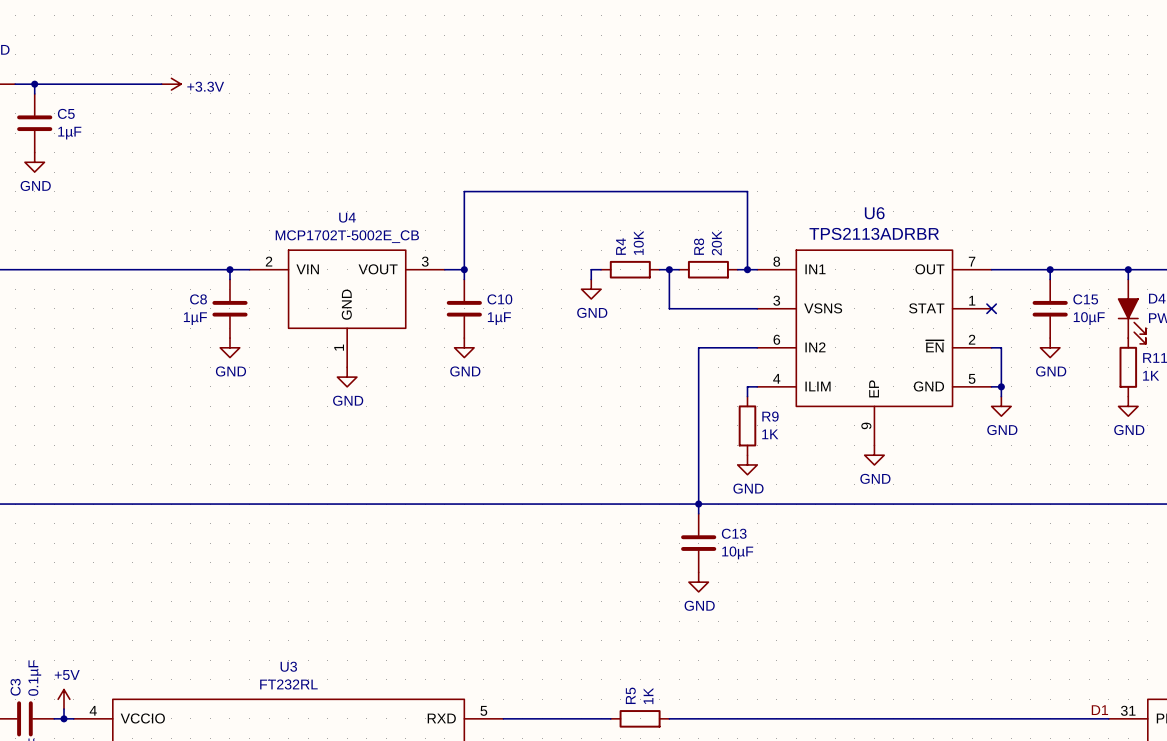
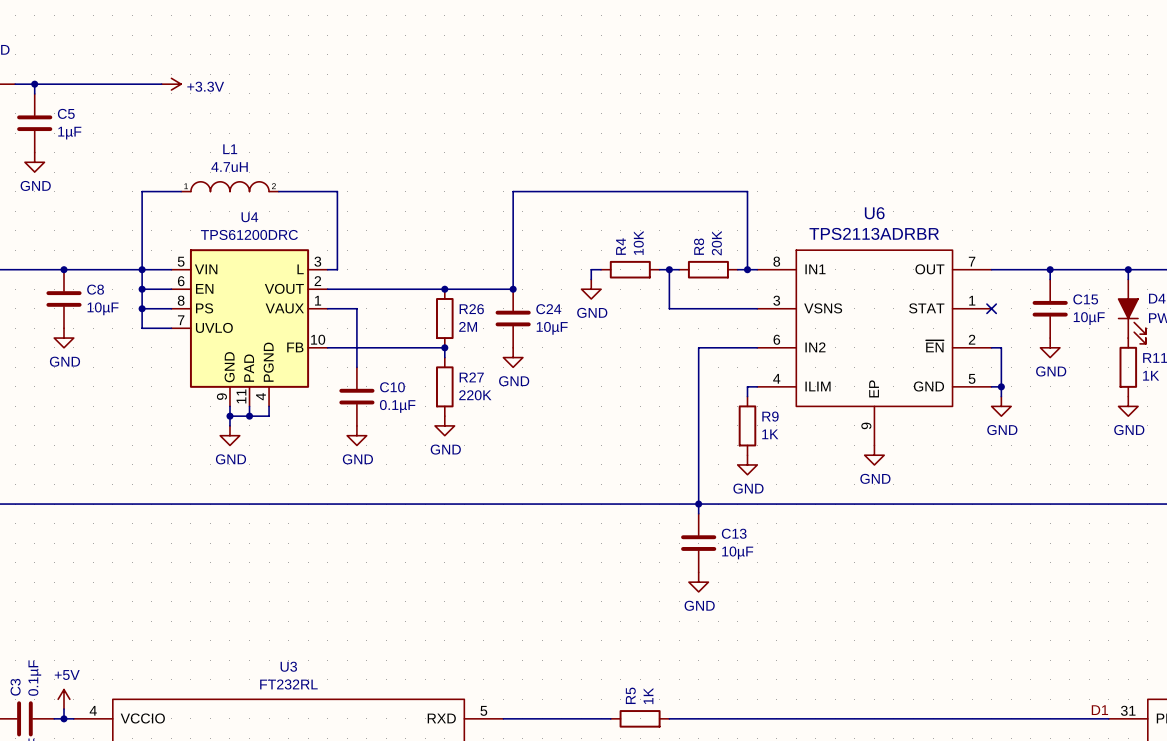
L1: none -> 4.7uH (229, 186)
wire: none -> (181, 191) (142, 191) (142, 328) (171, 328)
wire: none -> (278, 191) (337, 191) (337, 269) (327, 269)
wire: (513, 191) (464, 191) (464, 279) -> (513, 191) (513, 289) (327, 289)
U4 name position: U4 (347, 217) -> U4 (249, 217)
U4 value: MCP1702T-5002E_CB (347, 236) -> TPS61200DRC (249, 234)
U4 symbol: [249, 250, 445, 368] -> [171, 249, 328, 407]
junction: none -> (64, 269)
junction: none -> (142, 269)
junction: (229, 269) -> none
wire: (444, 269) (464, 269) -> none
junction: (464, 269) -> none
wire: none -> (142, 289) (171, 289)
junction: none -> (142, 289)
junction: none -> (444, 289)
junction: none -> (513, 289)
C8 name position: C8 (198, 299) -> C8 (95, 289)
wire: none -> (142, 308) (171, 308)
junction: none -> (142, 308)
C8 position: (229, 308) -> (64, 298)
wire: none -> (327, 308) (356, 308) (356, 367)
C10 position: (464, 308) -> (356, 396)
C8 value: 1µF (195, 318) -> 10µF (103, 308)
R26: none -> 2M (444, 318)
C10 value: 1µF (499, 318) -> 0.1µF (397, 406)
C24: none -> 10µF (513, 318)
power symbol: none -> GND (64, 338)
power symbol: GND (229, 347) -> none
wire: none -> (327, 347) (444, 347) (444, 357)
junction: none -> (444, 347)
power symbol: GND (464, 347) -> none
power symbol: none -> GND (513, 357)
power symbol: GND (347, 377) -> none
R27: none -> 220K (444, 386)
wire: none -> (229, 406) (229, 425)
wire: none -> (269, 406) (269, 416) (229, 416)
junction: none -> (229, 416)
junction: none -> (249, 416)
power symbol: none -> GND (444, 425)
power symbol: none -> GND (229, 435)
power symbol: none -> GND (356, 435)

